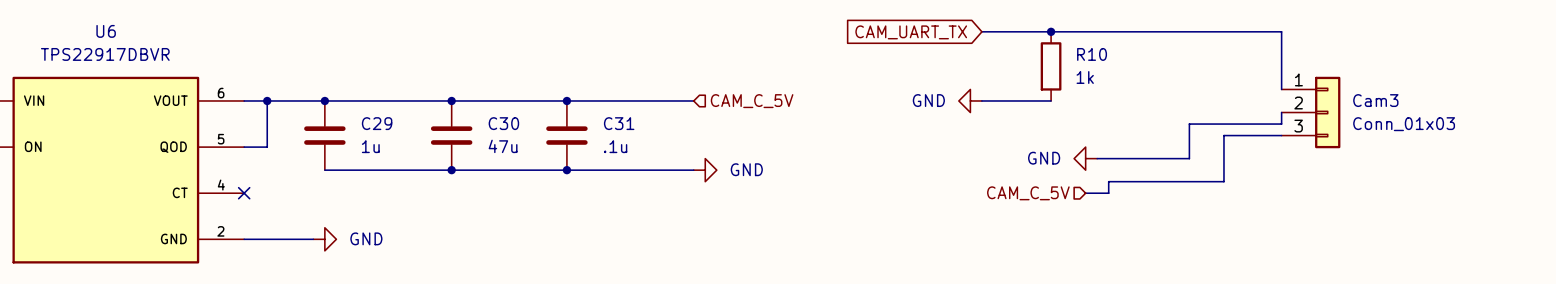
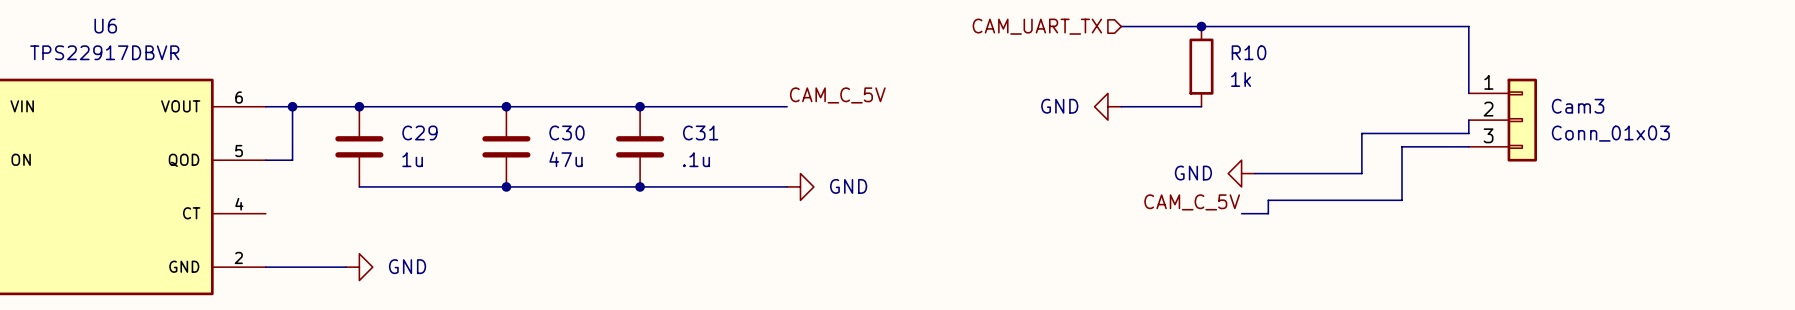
hierarchical label: none -> CAM_UART_TX (1037, 26)
global label: CAM_UART_TX (911, 32) -> none
label: none -> CAM_C_5V (837, 95)
hierarchical label: CAM_C_5V (752, 101) -> none
label: none -> CAM_C_5V (1192, 202)
no-connect mark: (244, 193) -> none
hierarchical label: CAM_C_5V (1028, 193) -> none

